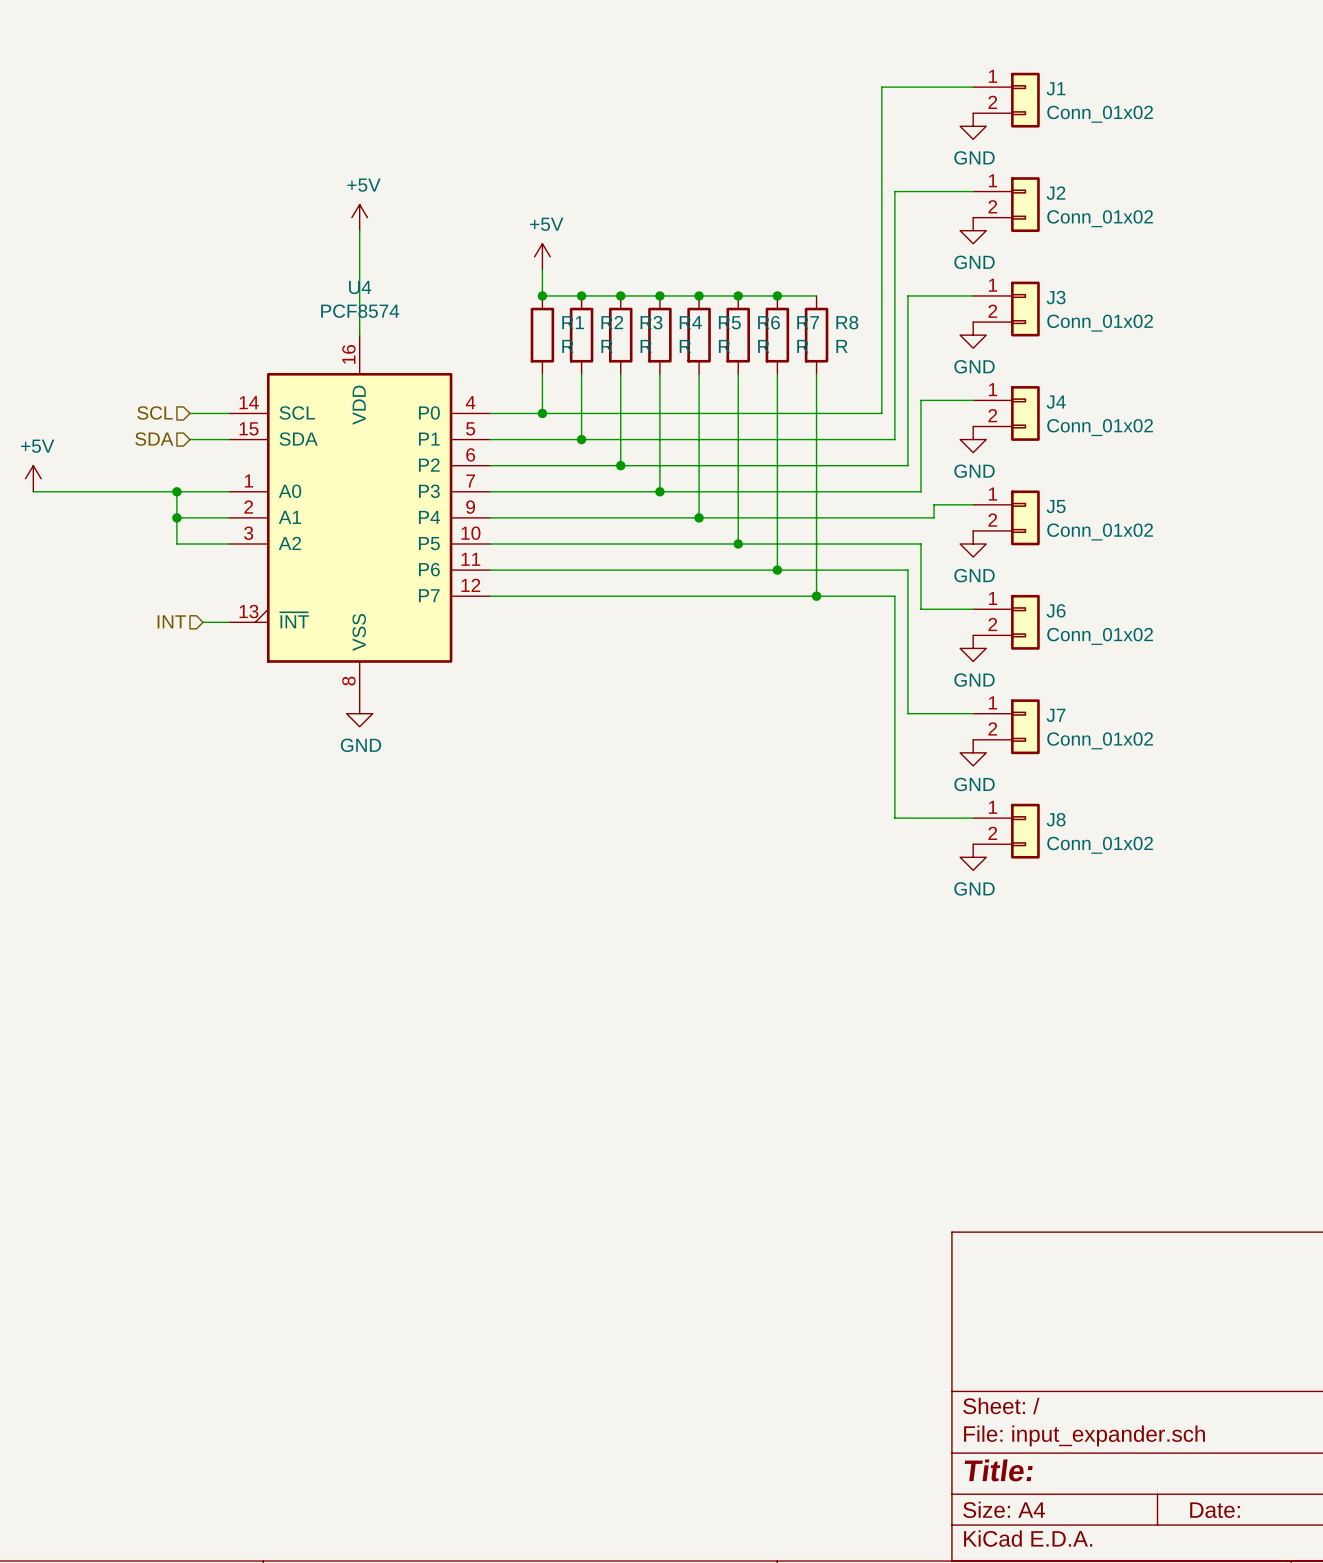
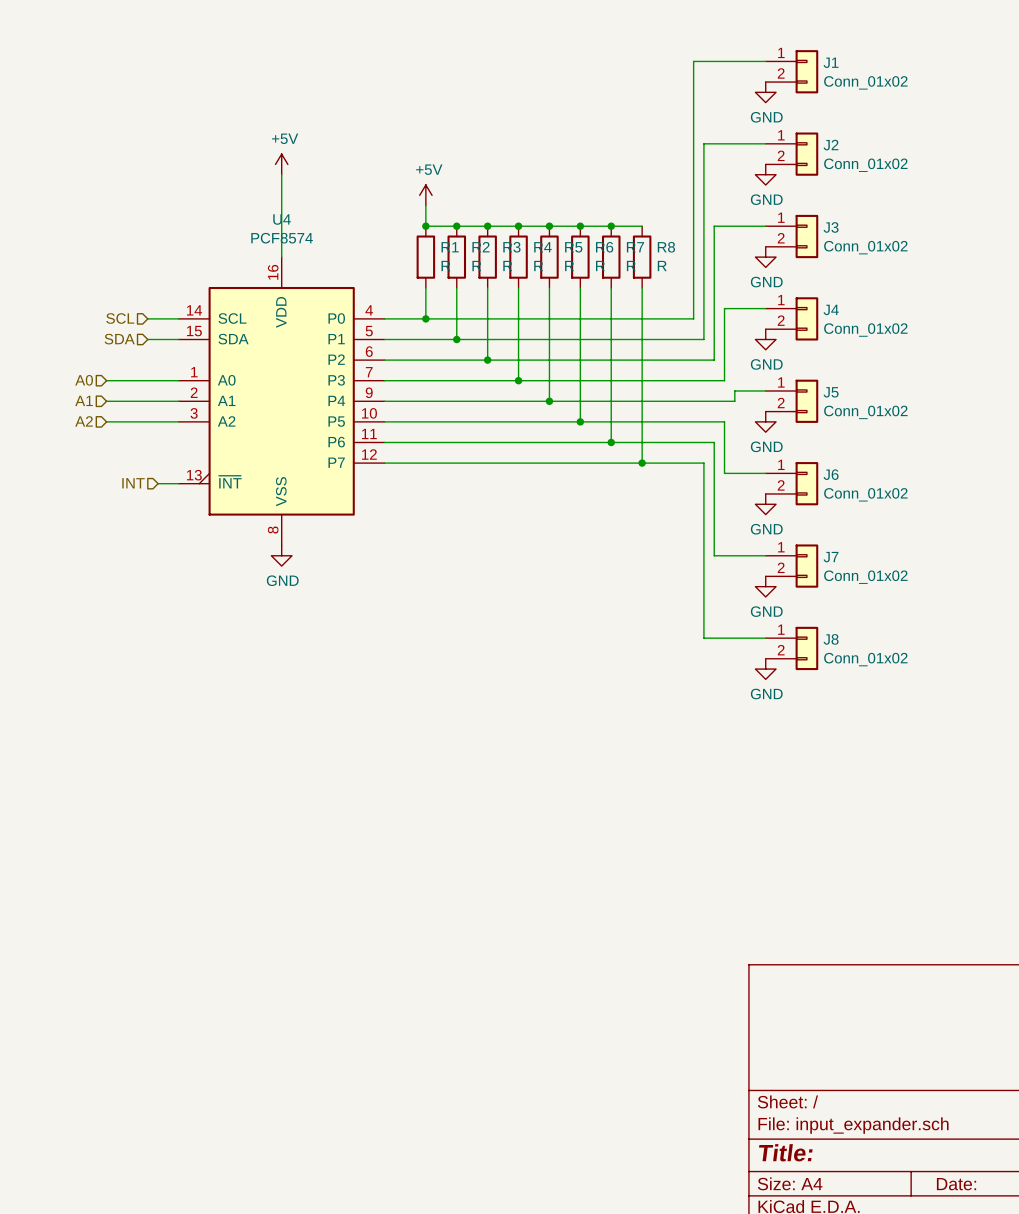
power symbol: +5V (33, 478) -> none
wire: (33, 491) (137, 491) -> none
hierarchical label: none -> A0 (84, 380)
wire: (176, 491) (176, 543) -> (106, 421) (137, 421)
junction: (176, 491) -> none
hierarchical label: none -> A1 (84, 400)
wire: none -> (106, 401) (137, 401)
junction: (176, 517) -> none
hierarchical label: none -> A2 (84, 421)

